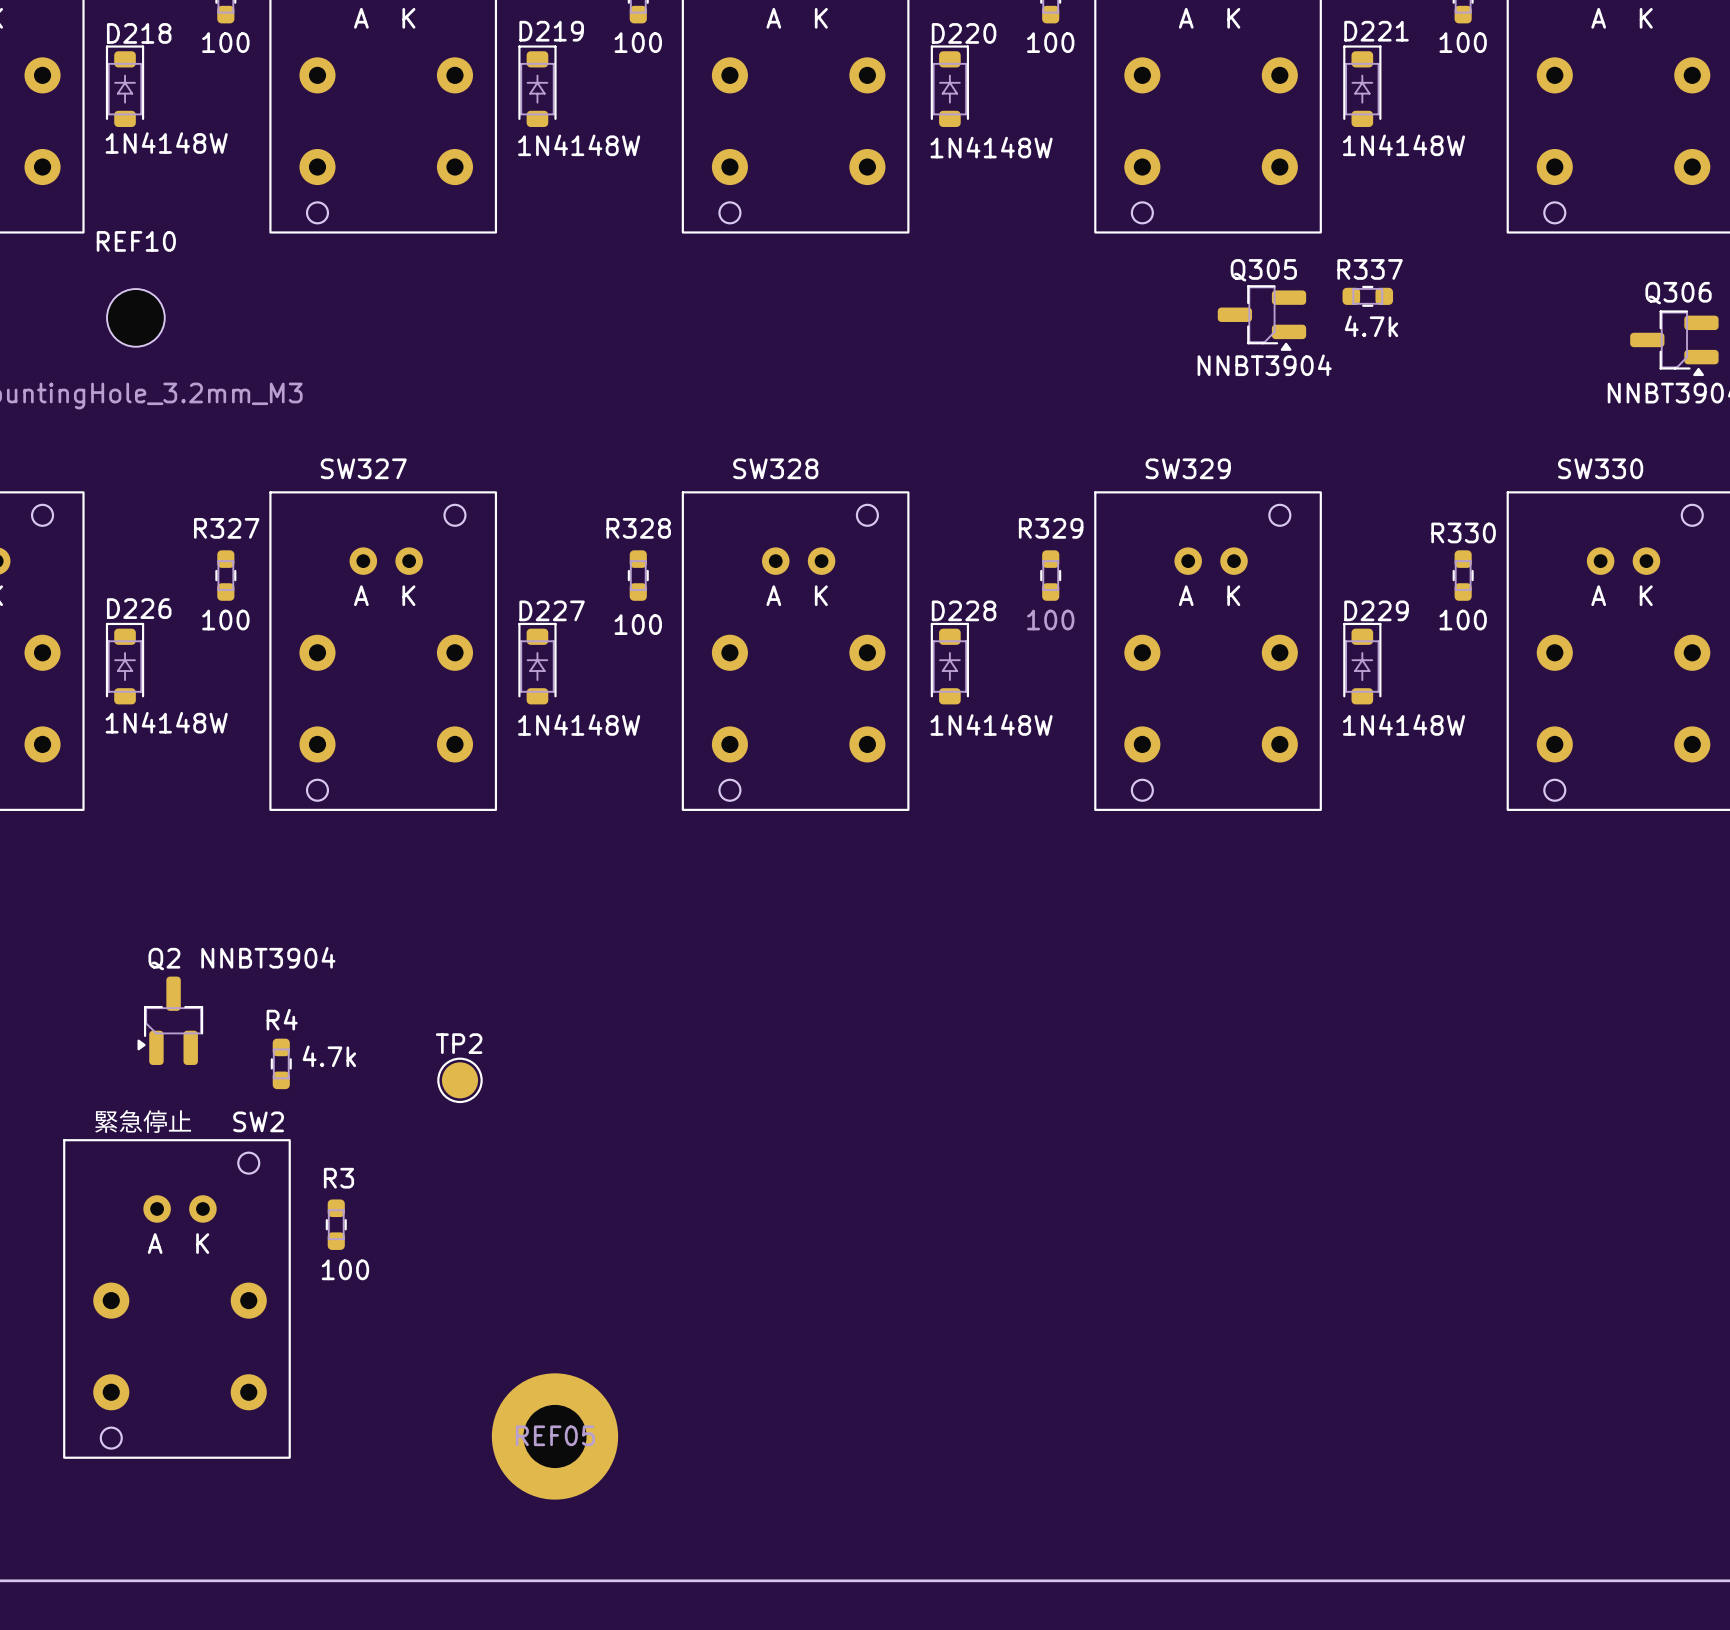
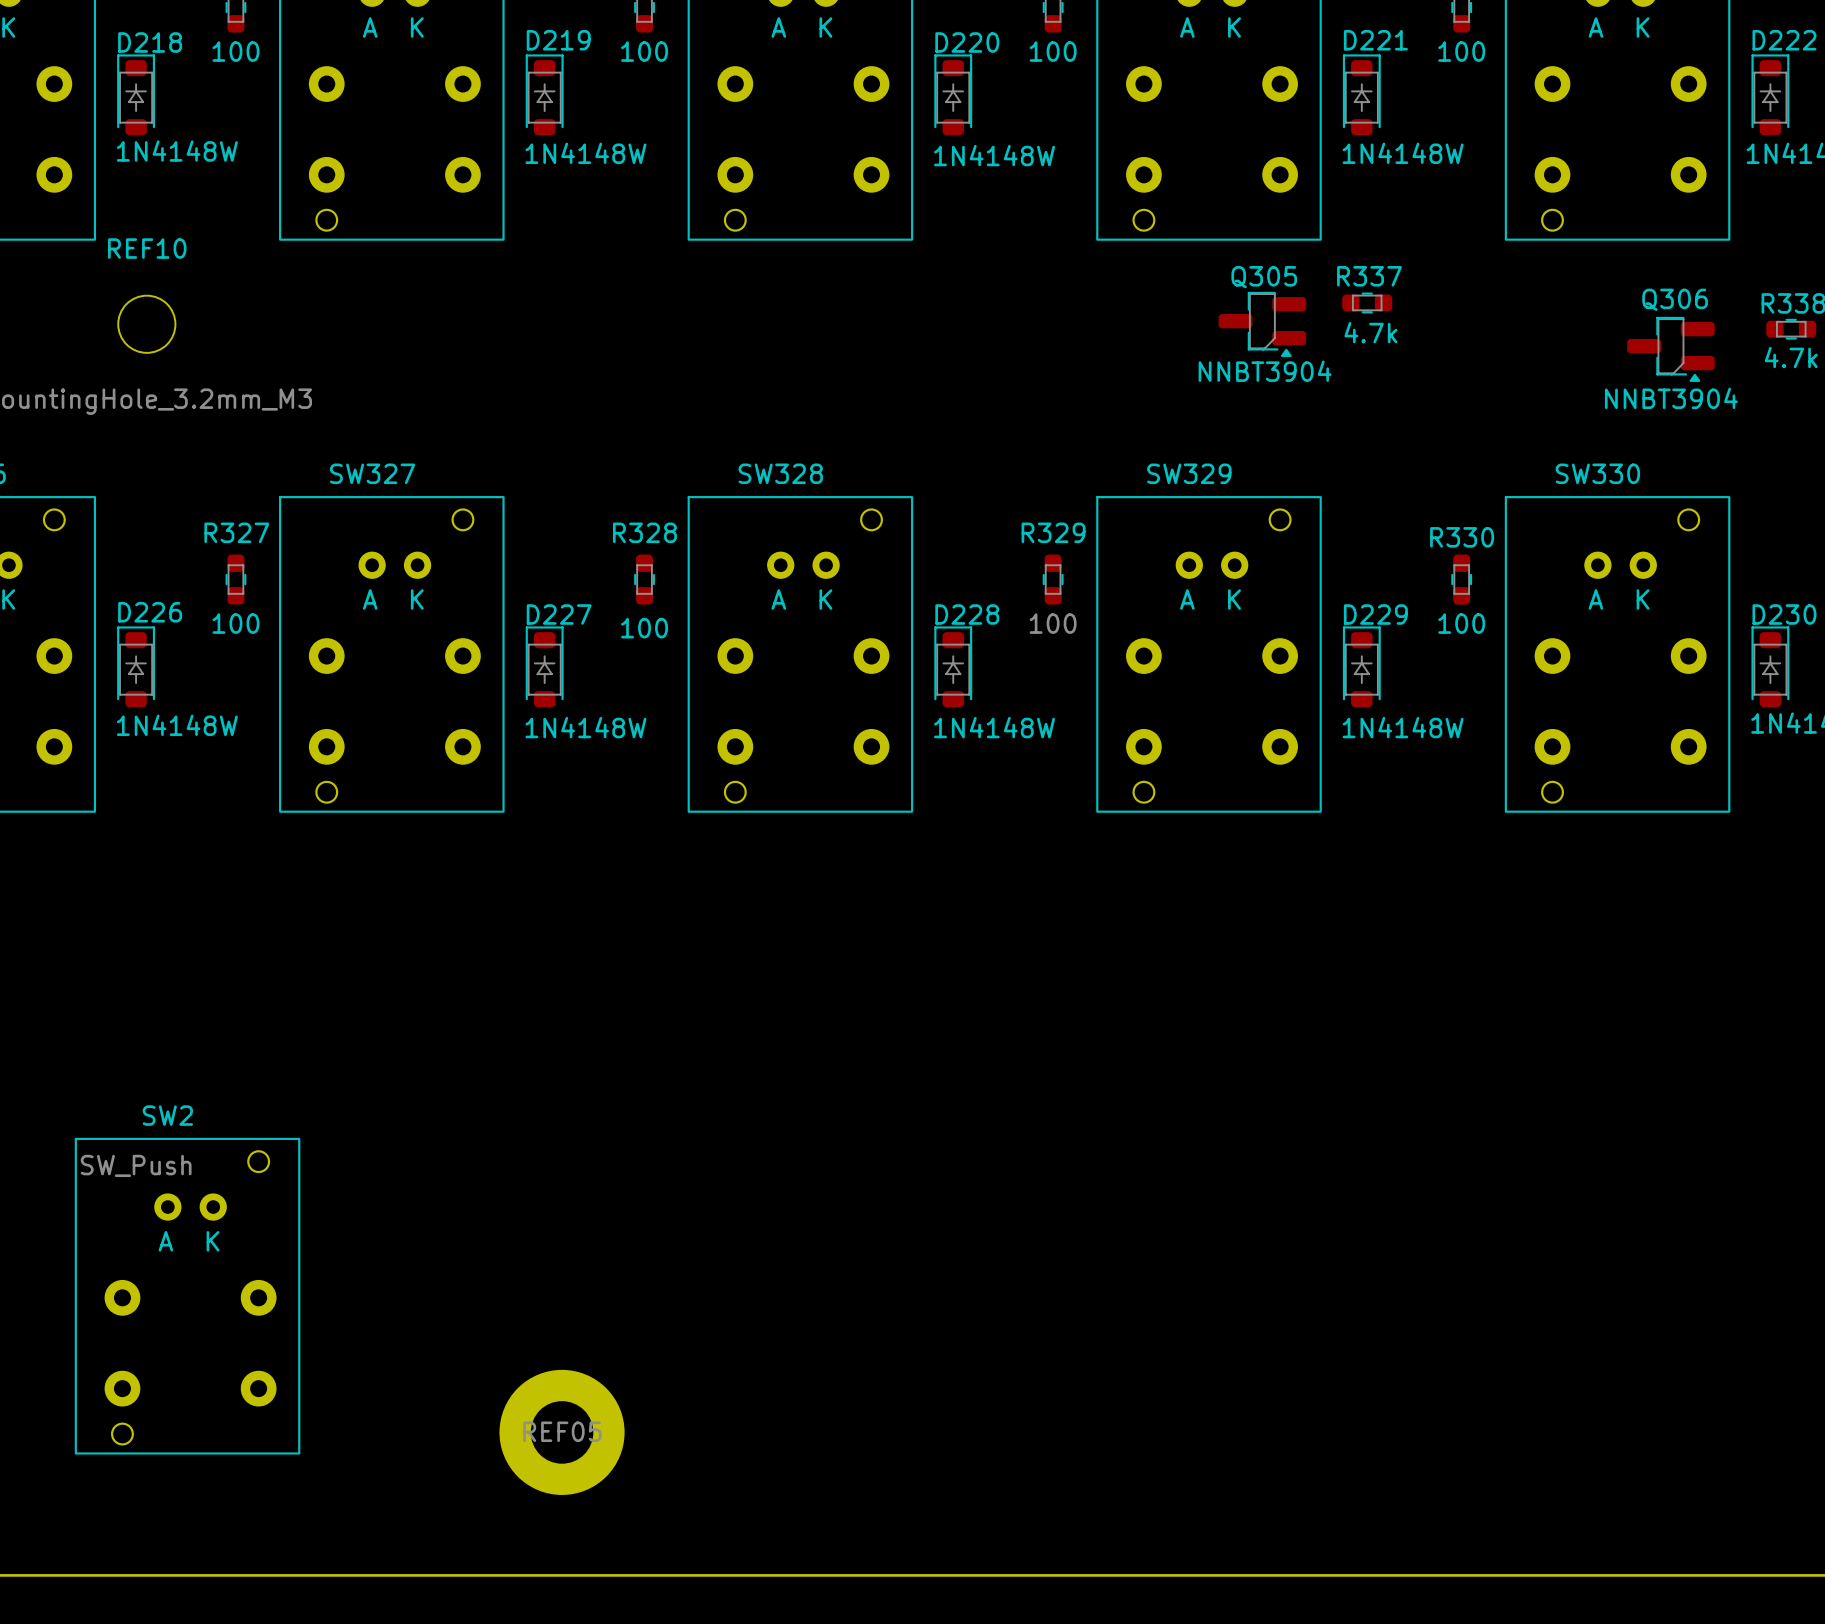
Q2: NNBT3904 (170, 1020) -> none
R4: 4.7k (281, 1063) -> none
TP2: (459, 1080) -> none
SW2 value: 緊急停止 (143, 1121) -> SW_Push (136, 1165)
SW2 name position: SW2 (258, 1121) -> SW2 (167, 1115)
R3: 100 (336, 1224) -> none

